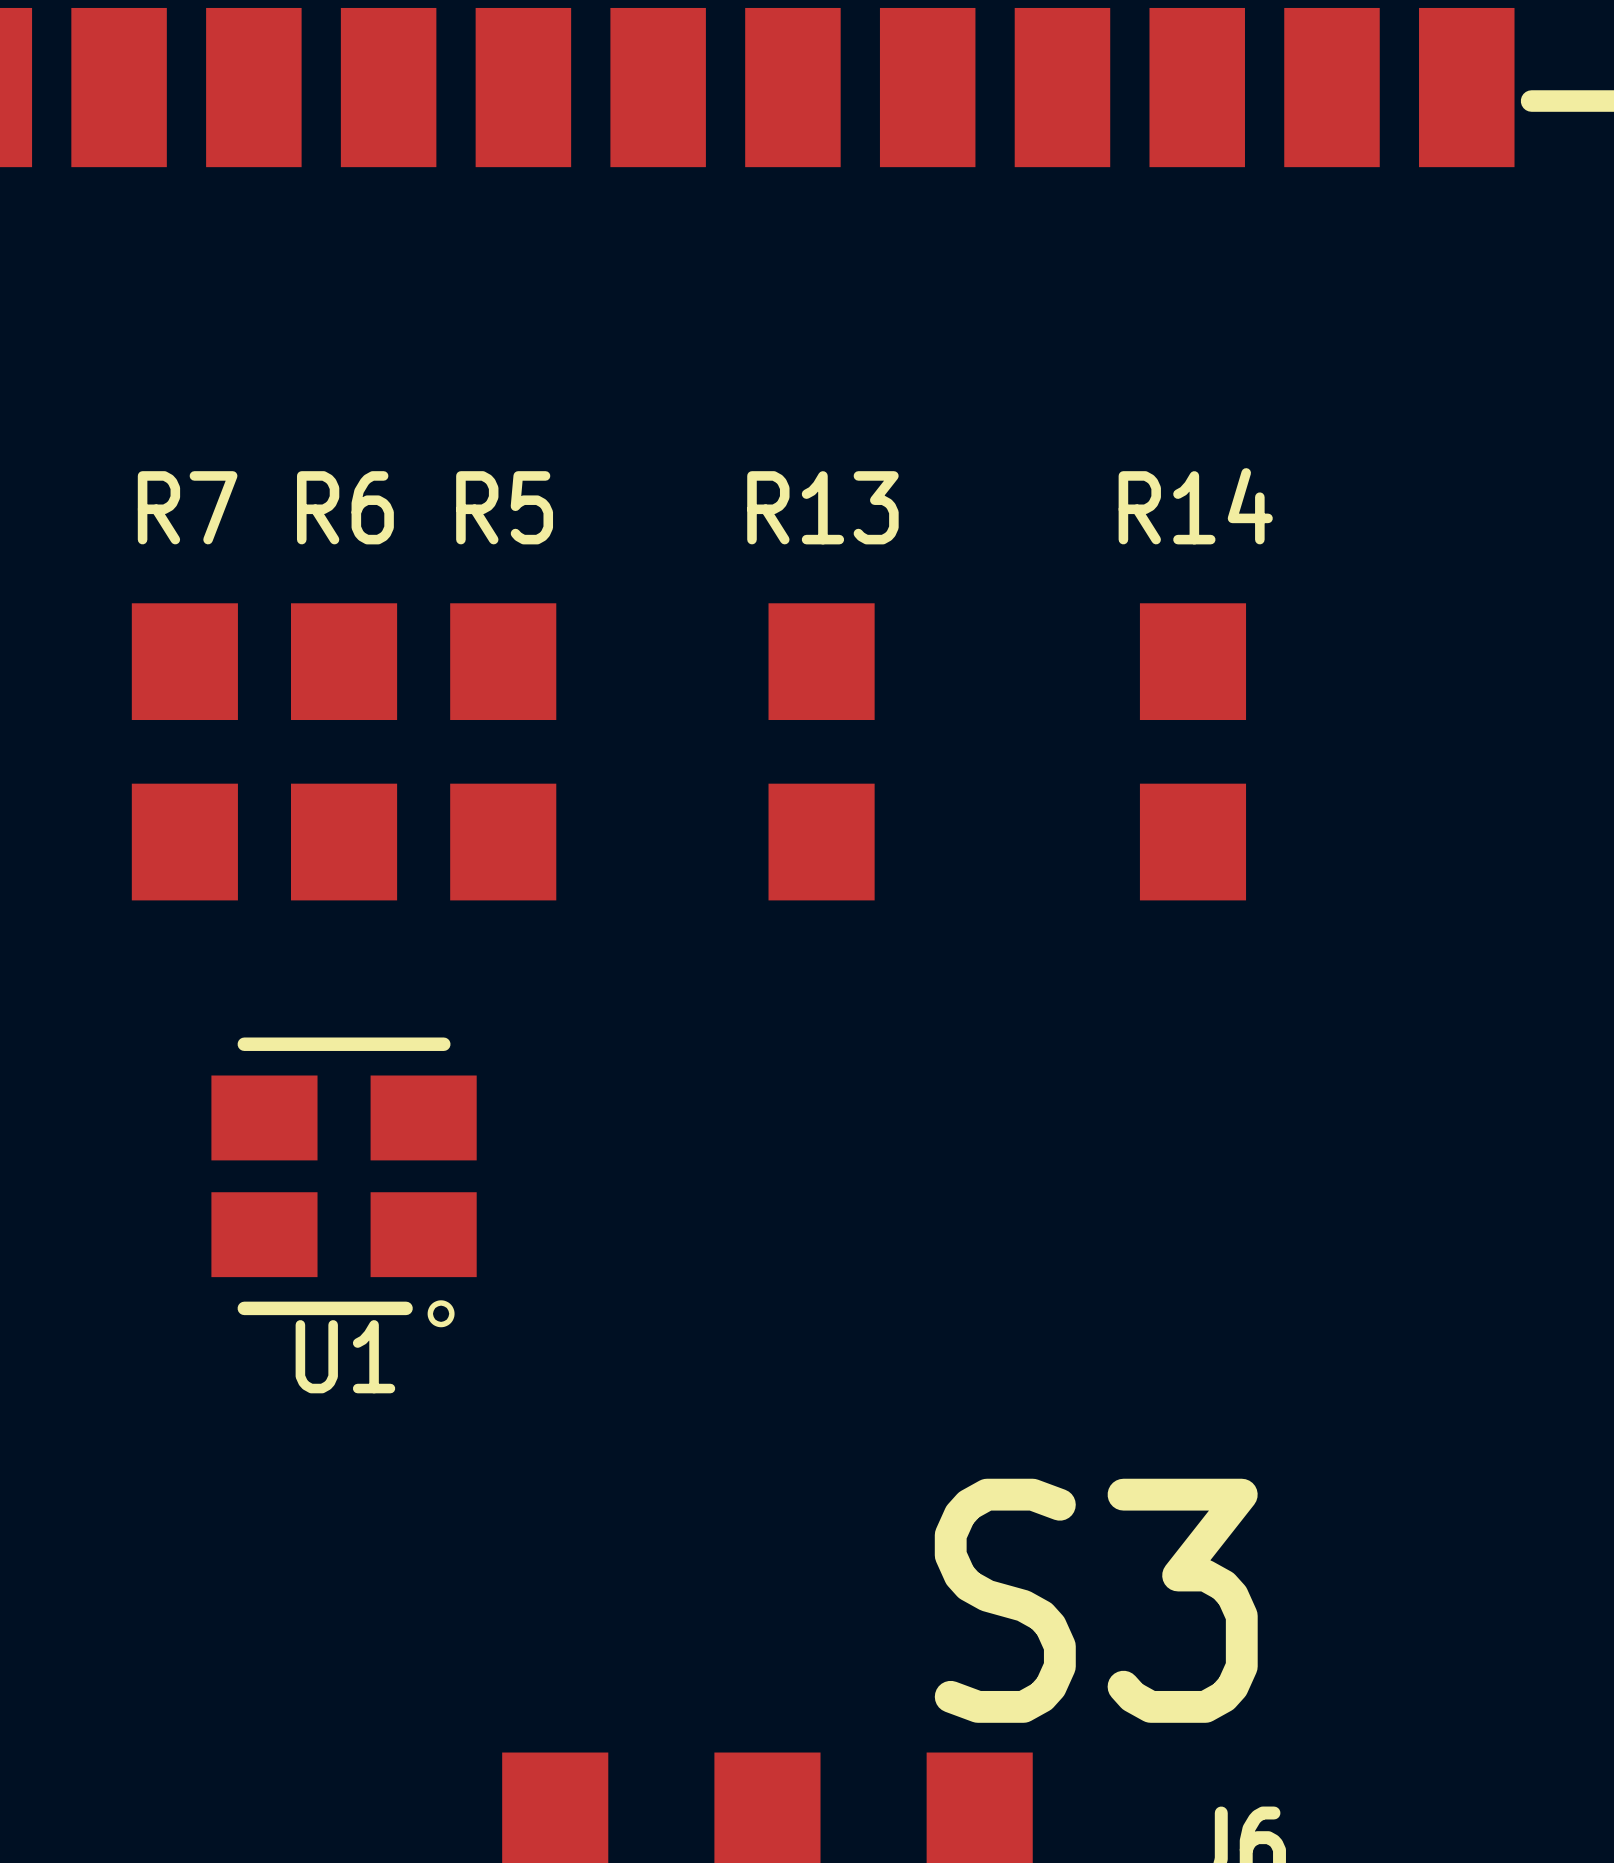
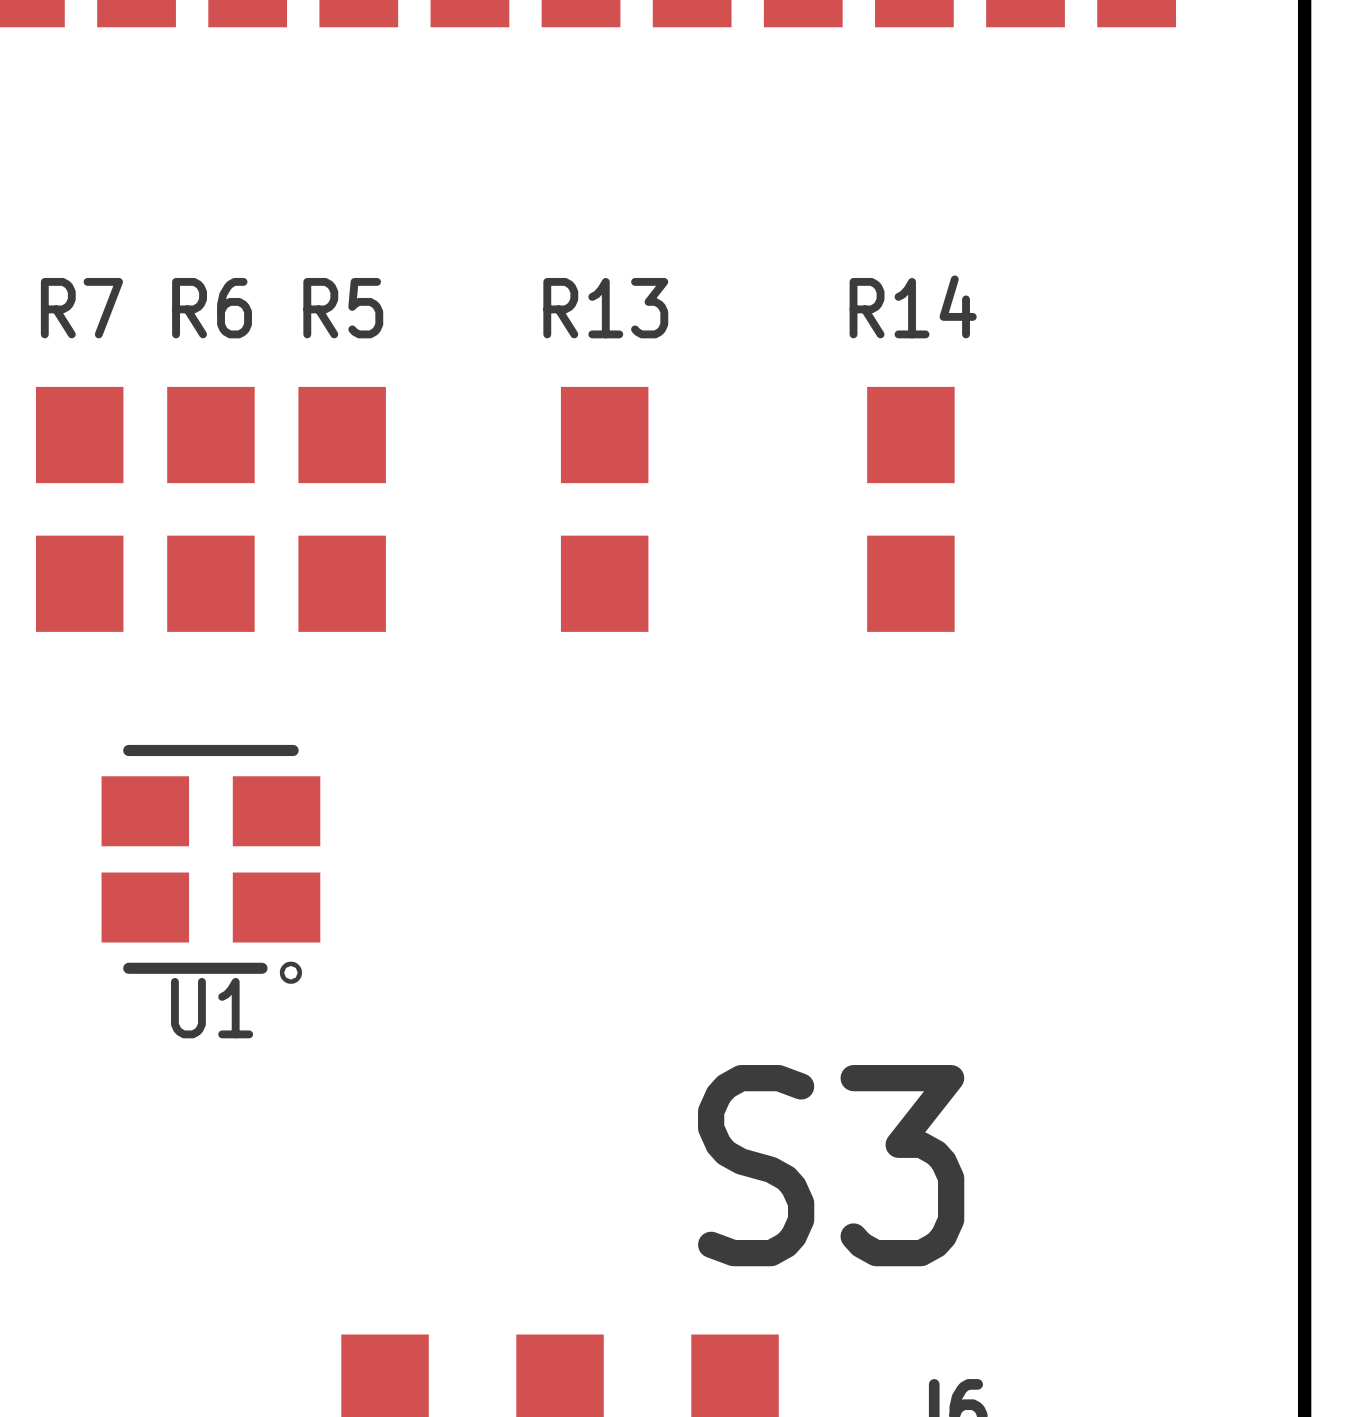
text position: S3 (1096, 1600) -> S3 (831, 1165)

